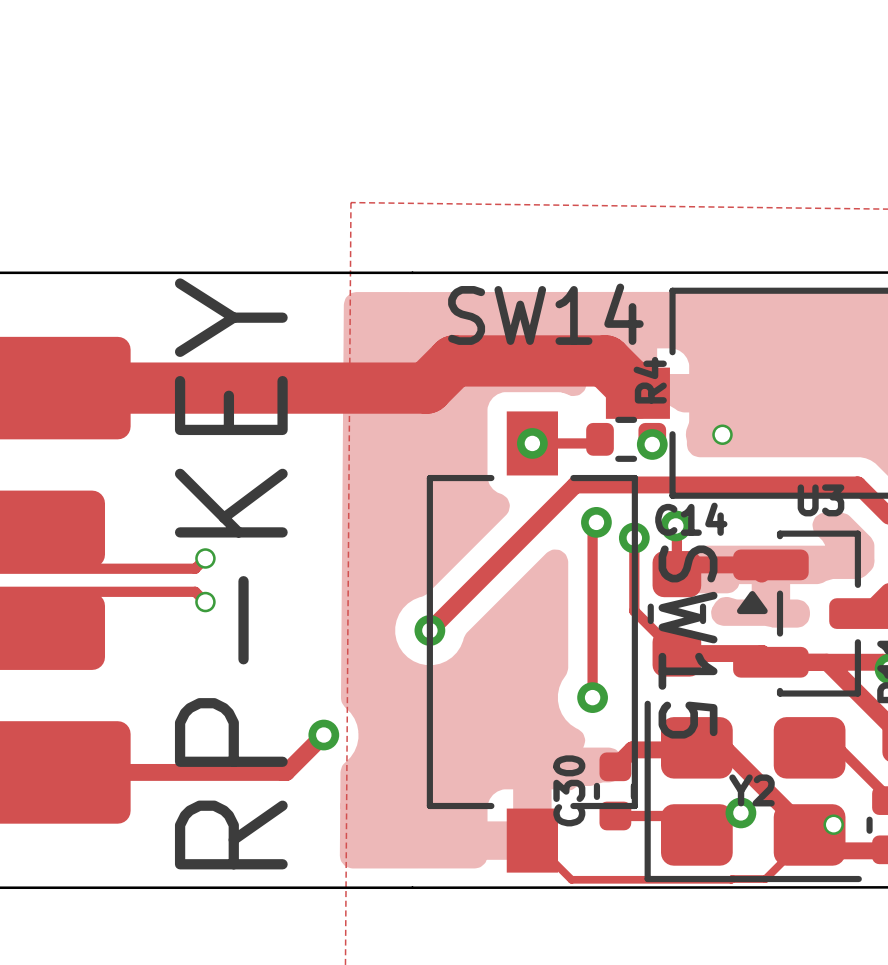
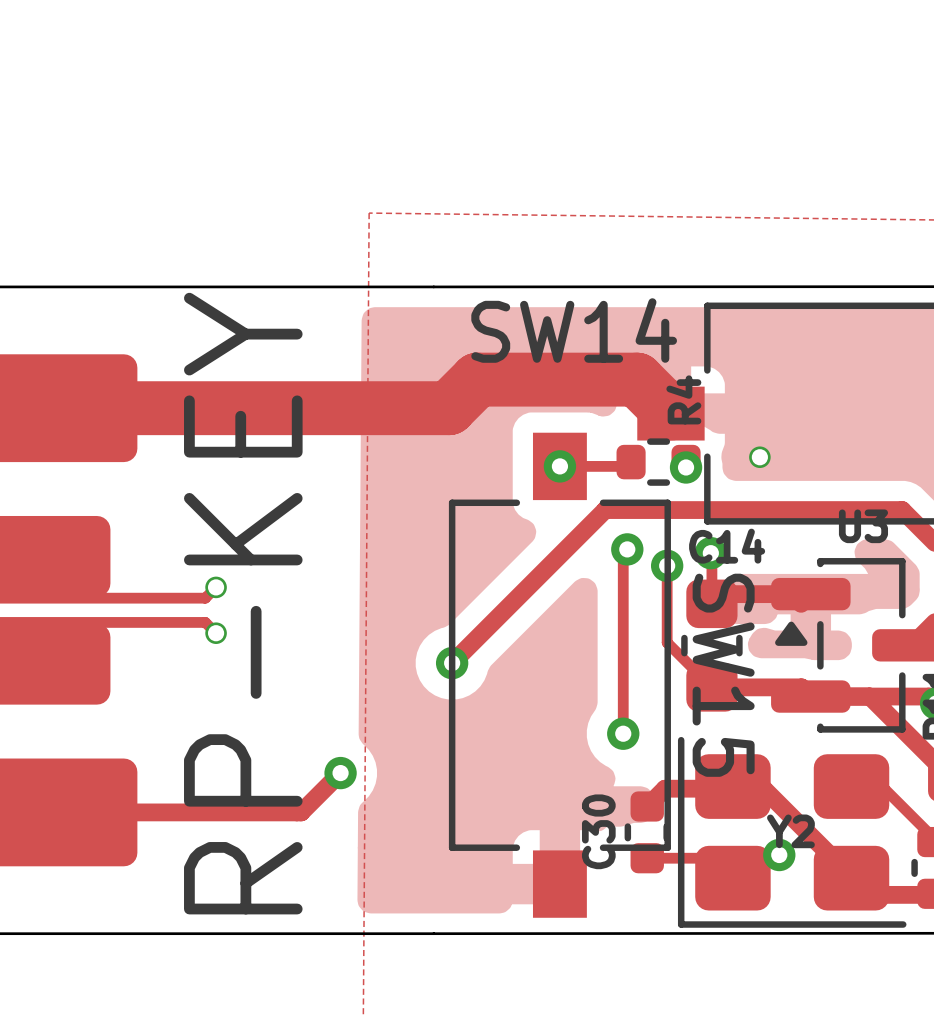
via: (833, 824) -> none
track: (809, 834) (765, 879) (731, 879) (571, 879) (532, 840) -> none

